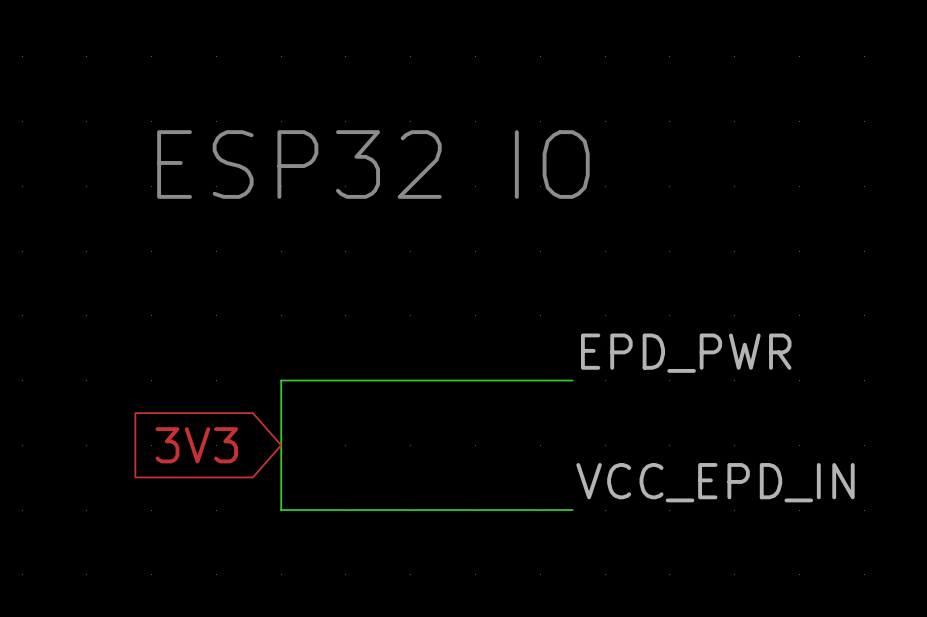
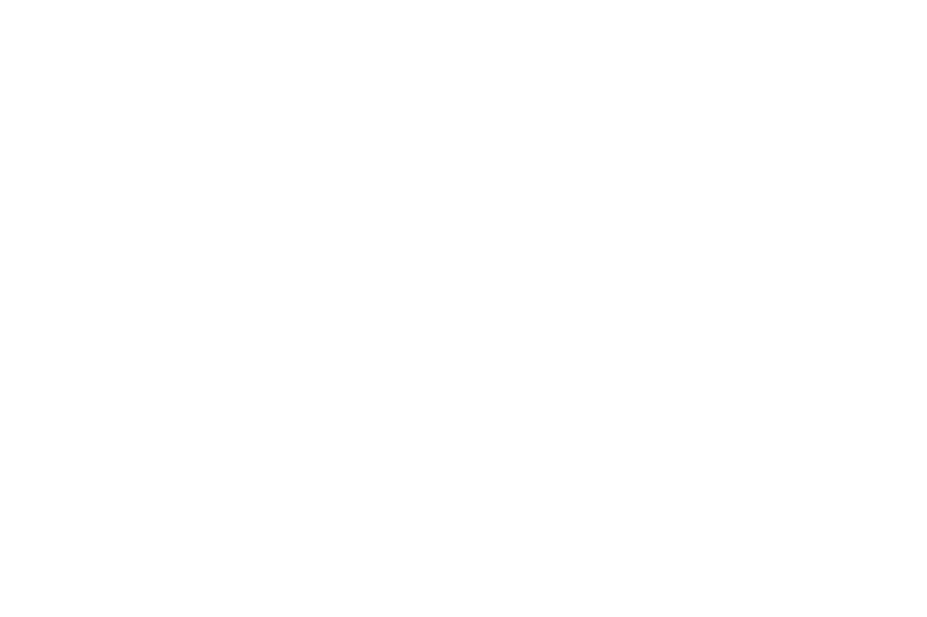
text: ESP32 IO (373, 164) -> none
label: EPD_PWR (686, 353) -> none
wire: (572, 380) (281, 380) (281, 510) (572, 510) -> none
global label: 3V3 (196, 445) -> none
label: VCC_EPD_IN (715, 482) -> none

